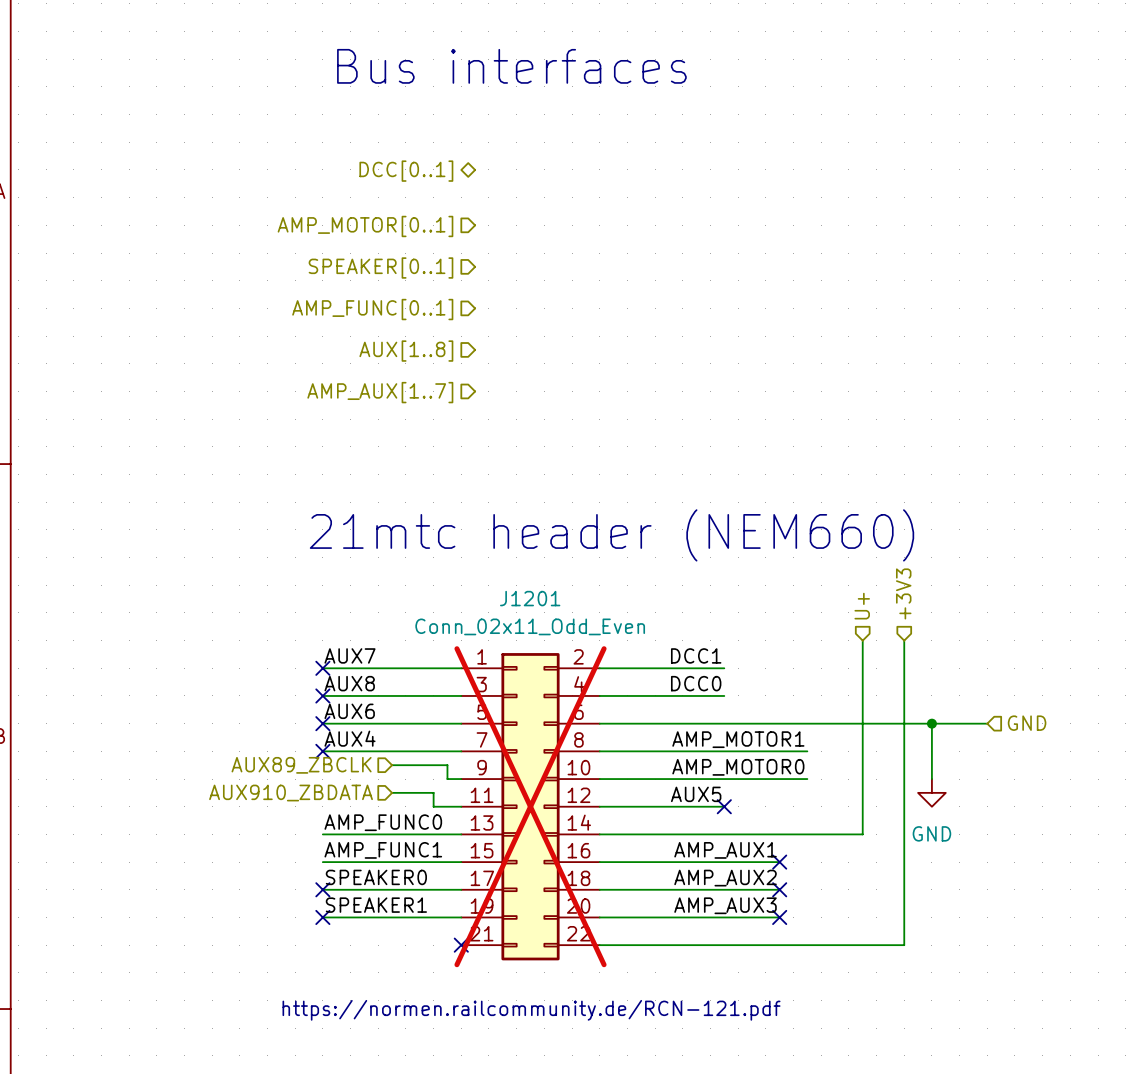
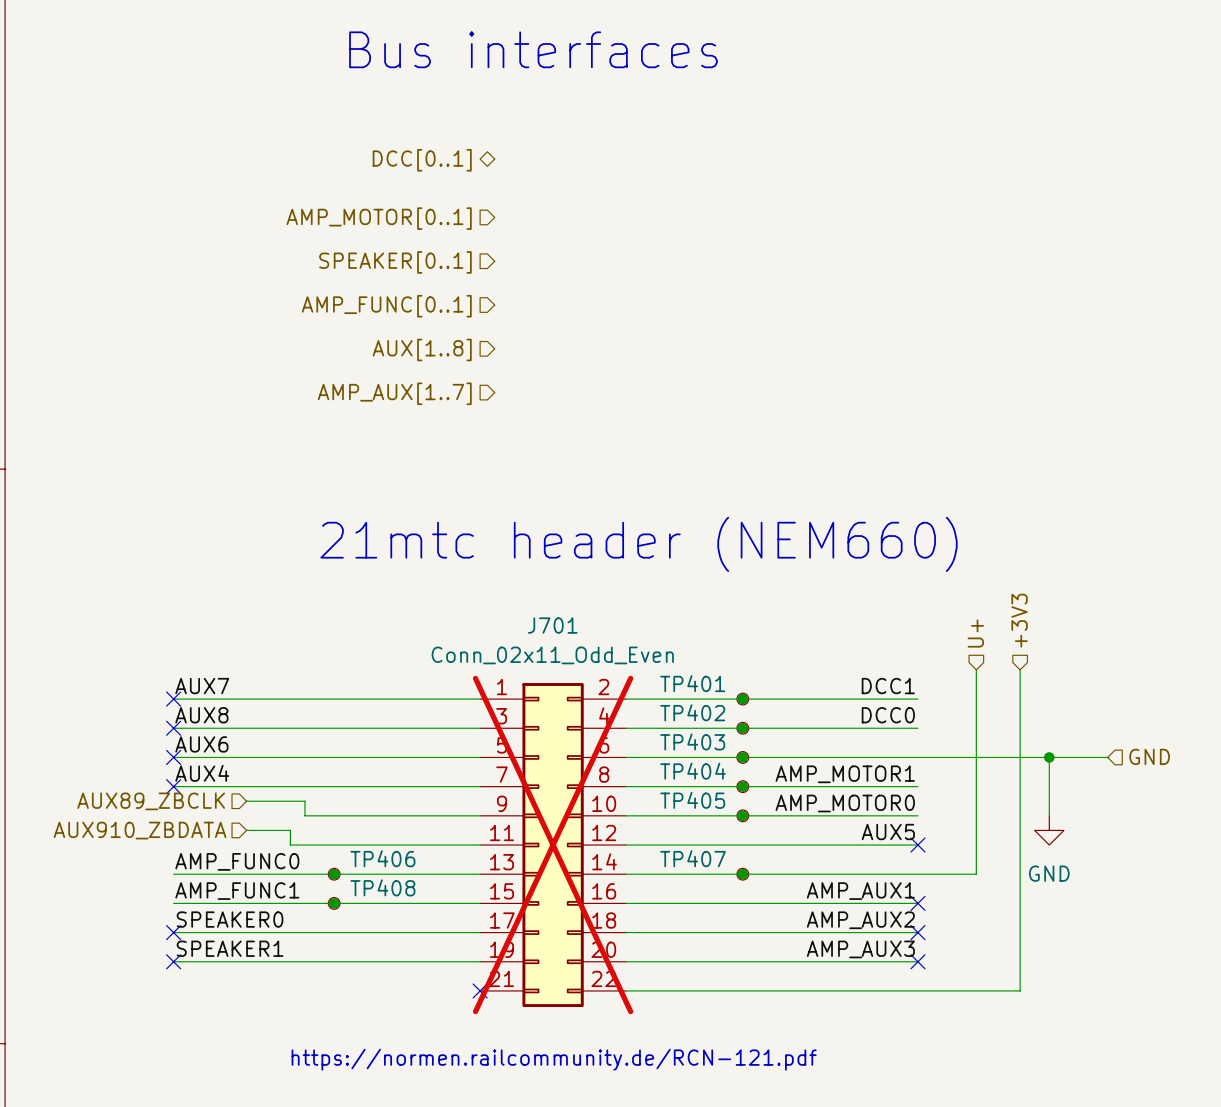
hierarchical label position: +3V3 (903, 593) -> +3V3 (1019, 620)
hierarchical label position: U+ (862, 606) -> U+ (975, 633)
wire: (862, 640) (862, 834) (599, 834) -> none
wire: (904, 640) (904, 945) (599, 945) -> none
wire: none -> (976, 669) (976, 742)
wire: none -> (1020, 669) (1020, 990) (626, 990)
label position: AUX7 (350, 655) -> AUX7 (202, 686)
label position: DCC1 (696, 655) -> DCC1 (888, 686)
wire: (322, 668) (461, 668) -> none
no-connect mark: (322, 668) -> none
wire: (599, 668) (724, 668) -> none
wire: none -> (173, 699) (480, 699)
no-connect mark: none -> (173, 699)
wire: none -> (626, 699) (917, 699)
junction: none -> (742, 699)
TP401: none -> (742, 699)
label position: AUX8 (349, 683) -> AUX8 (201, 715)
label position: DCC0 (696, 683) -> DCC0 (888, 715)
wire: (322, 695) (461, 695) -> none
no-connect mark: (322, 695) -> none
wire: (599, 695) (724, 695) -> none
wire: none -> (173, 728) (480, 728)
no-connect mark: none -> (173, 728)
wire: none -> (626, 728) (917, 728)
junction: none -> (742, 728)
TP402: none -> (742, 728)
label position: AUX6 (349, 711) -> AUX6 (201, 744)
wire: (322, 723) (461, 723) -> none
no-connect mark: (322, 723) -> none
wire: (599, 723) (987, 723) -> none
junction: (931, 723) -> none
hierarchical label position: GND (1027, 723) -> GND (1149, 756)
wire: none -> (173, 757) (480, 757)
no-connect mark: none -> (173, 757)
wire: none -> (626, 757) (1107, 757)
junction: none -> (742, 757)
TP403: none -> (742, 757)
wire: none -> (1049, 757) (1049, 815)
junction: none -> (1049, 757)
label position: AUX4 (350, 738) -> AUX4 (202, 773)
label position: AMP_MOTOR1 (738, 739) -> AMP_MOTOR1 (845, 774)
wire: (322, 751) (461, 751) -> none
no-connect mark: (322, 751) -> none
wire: (599, 751) (807, 751) -> none
wire: none -> (173, 786) (407, 786)
no-connect mark: none -> (173, 786)
hierarchical label position: AUX89_ZBCLK (301, 765) -> AUX89_ZBCLK (151, 801)
wire: (447, 765) (447, 779) (461, 779) -> (465, 786) (480, 786)
wire: none -> (626, 786) (917, 786)
junction: none -> (742, 786)
TP404: none -> (742, 786)
label position: AMP_MOTOR0 (738, 767) -> AMP_MOTOR0 (845, 803)
wire: none -> (246, 801) (304, 801) (304, 815) (407, 815)
wire: (599, 779) (807, 779) -> none
wire: none -> (976, 801) (976, 874) (626, 874)
wire: (433, 792) (433, 806) (461, 806) -> (450, 815) (480, 815)
wire: none -> (626, 815) (917, 815)
junction: none -> (742, 815)
TP405: none -> (742, 815)
power symbol position: GND (931, 792) -> GND (1049, 830)
hierarchical label position: AUX910_ZBDATA (291, 793) -> AUX910_ZBDATA (140, 830)
label position: AUX5 (696, 794) -> AUX5 (888, 832)
wire: none -> (246, 830) (290, 830) (290, 845) (480, 845)
J1201: Conn_02x11_Odd_Even (530, 806) -> none
wire: (599, 806) (724, 806) -> none
no-connect mark: (724, 806) -> none
J701: none -> Conn_02x11_Odd_Even (553, 845)
wire: none -> (626, 845) (917, 845)
no-connect mark: none -> (917, 845)
label position: AMP_FUNC0 (383, 822) -> AMP_FUNC0 (237, 861)
wire: (322, 834) (461, 834) -> none
wire: none -> (173, 874) (480, 874)
junction: none -> (334, 874)
TP406: none -> (334, 874)
junction: none -> (742, 874)
TP407: none -> (742, 874)
label position: AMP_FUNC1 (383, 850) -> AMP_FUNC1 (237, 891)
label position: AMP_AUX1 (725, 850) -> AMP_AUX1 (860, 891)
wire: (322, 862) (461, 862) -> none
wire: (599, 862) (779, 862) -> none
no-connect mark: (779, 862) -> none
wire: none -> (173, 903) (480, 903)
junction: none -> (334, 903)
TP408: none -> (334, 903)
wire: none -> (626, 903) (917, 903)
no-connect mark: none -> (917, 903)
label position: SPEAKER0 (376, 877) -> SPEAKER0 (230, 919)
label position: AMP_AUX2 (725, 878) -> AMP_AUX2 (860, 920)
wire: (322, 889) (461, 889) -> none
no-connect mark: (322, 889) -> none
wire: (599, 889) (779, 889) -> none
no-connect mark: (779, 889) -> none
wire: none -> (173, 932) (480, 932)
no-connect mark: none -> (173, 932)
wire: none -> (626, 932) (917, 932)
no-connect mark: none -> (917, 932)
label position: SPEAKER1 (376, 905) -> SPEAKER1 (230, 948)
label position: AMP_AUX3 (725, 905) -> AMP_AUX3 (860, 949)
wire: (322, 917) (461, 917) -> none
no-connect mark: (322, 917) -> none
wire: (599, 917) (779, 917) -> none
no-connect mark: (779, 917) -> none
wire: none -> (173, 961) (480, 961)
no-connect mark: none -> (173, 961)
wire: none -> (626, 961) (917, 961)
no-connect mark: none -> (917, 961)
no-connect mark position: (461, 945) -> (480, 990)
text position: https://normen.railcommunity.de/RCN-121.pdf (531, 1010) -> https://normen.railcommunity.de/RCN-121.pdf (554, 1059)

